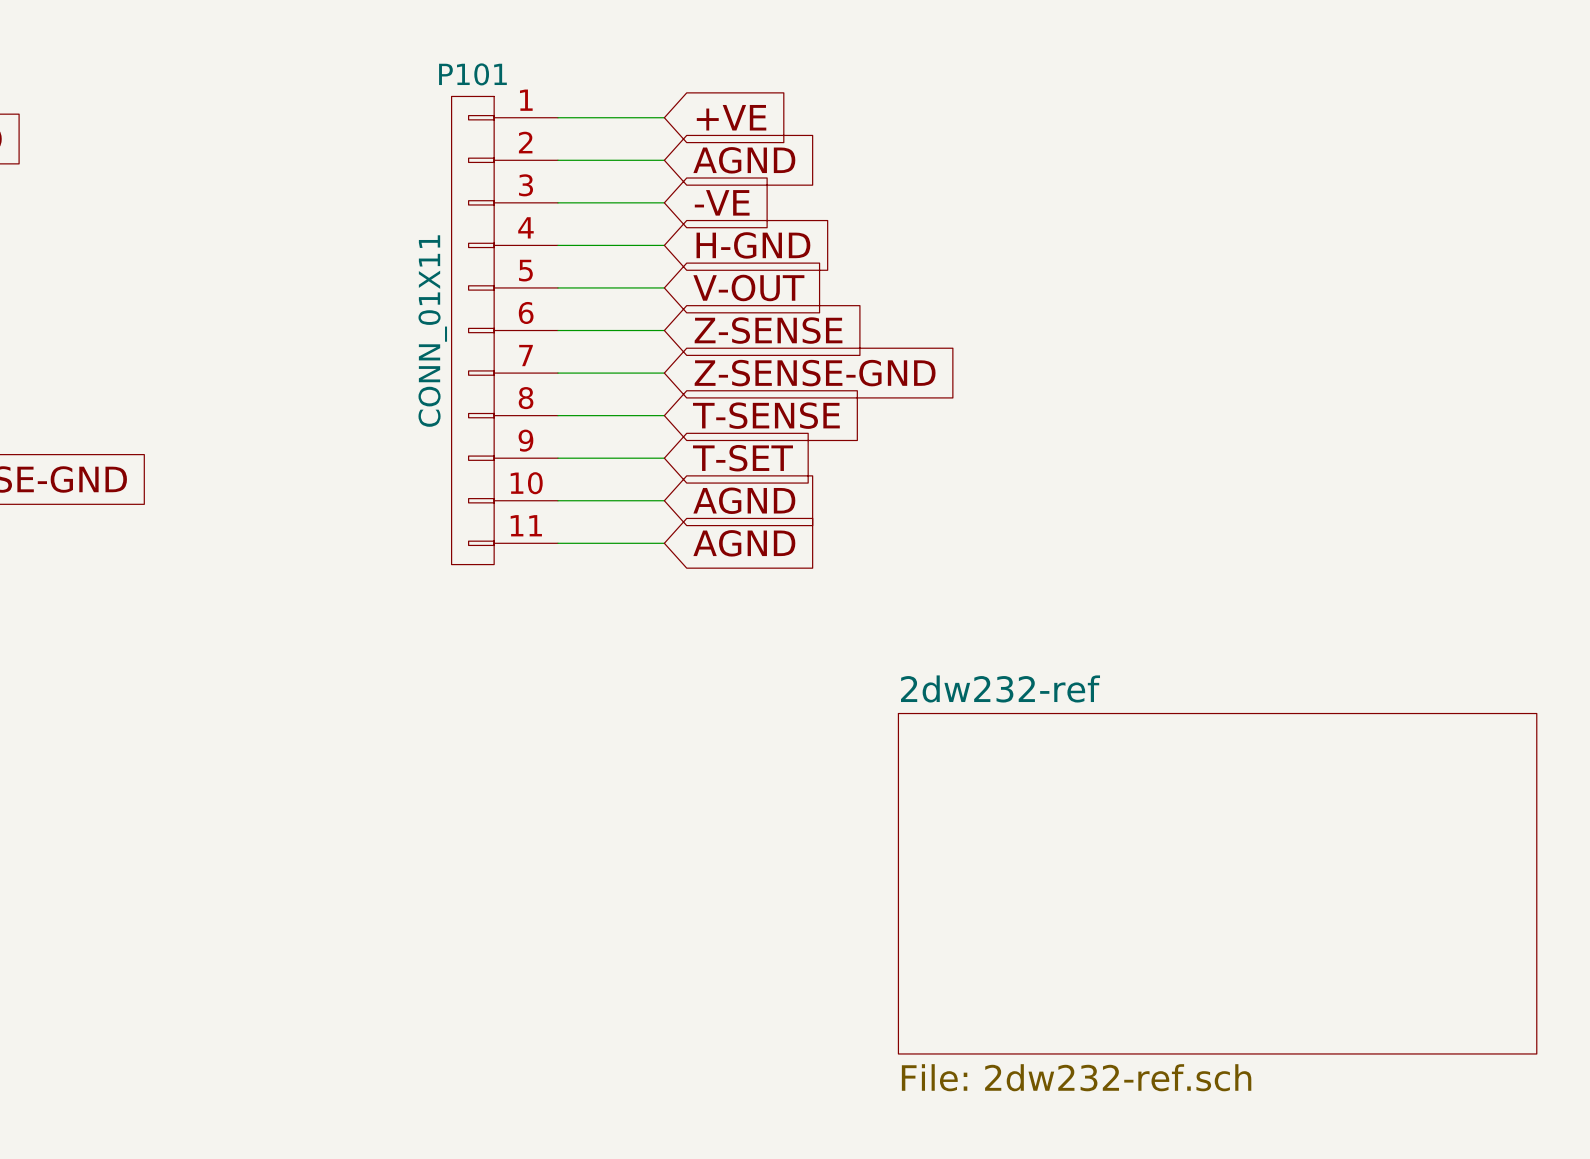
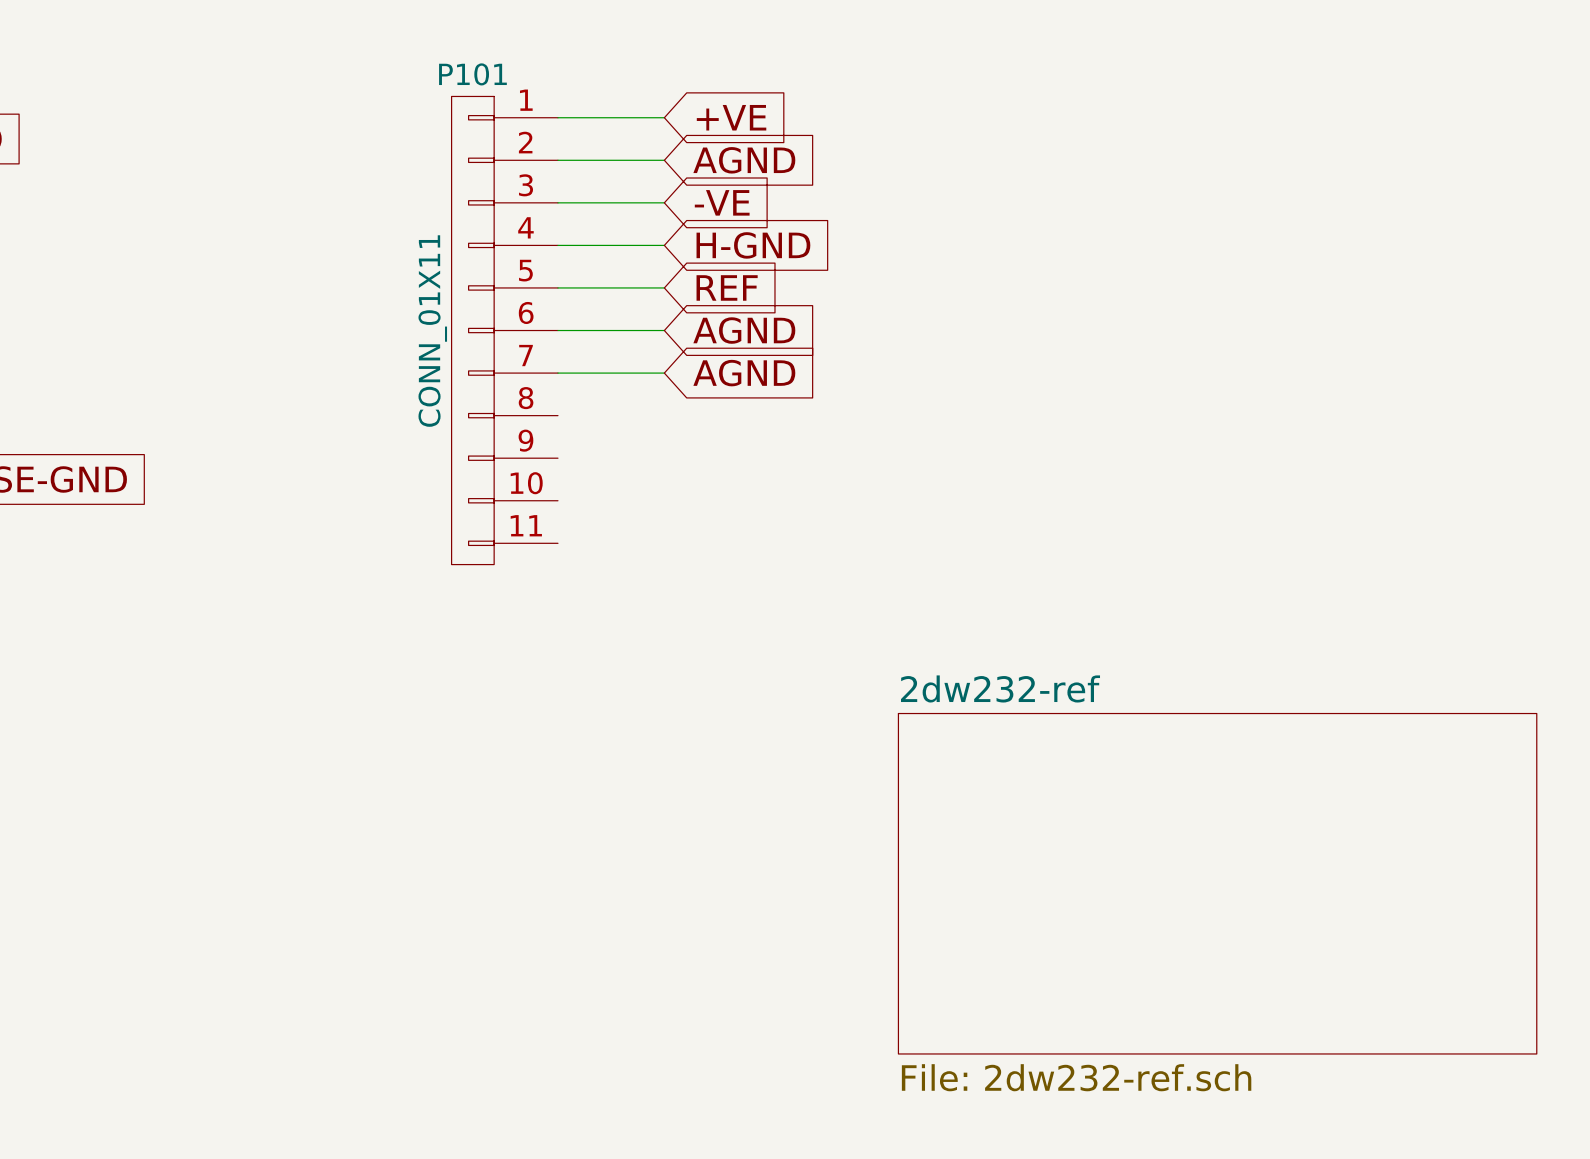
global label: V-OUT (748, 287) -> REF (727, 287)
global label: Z-SENSE (768, 330) -> AGND (744, 330)
global label: Z-SENSE-GND (815, 373) -> AGND (744, 373)
wire: (557, 415) (664, 415) -> none
global label: T-SENSE (766, 415) -> none
wire: (557, 458) (664, 458) -> none
global label: T-SET (742, 458) -> none
wire: (557, 500) (664, 500) -> none
global label: AGND (744, 500) -> none
wire: (557, 543) (664, 543) -> none
global label: AGND (744, 543) -> none

